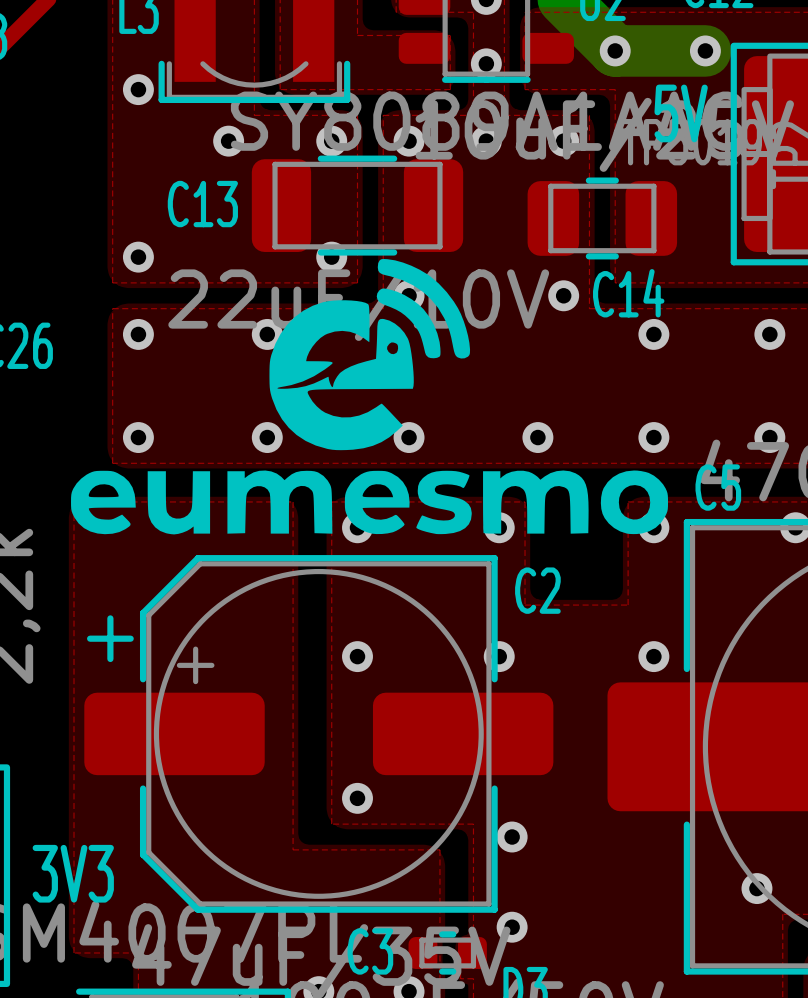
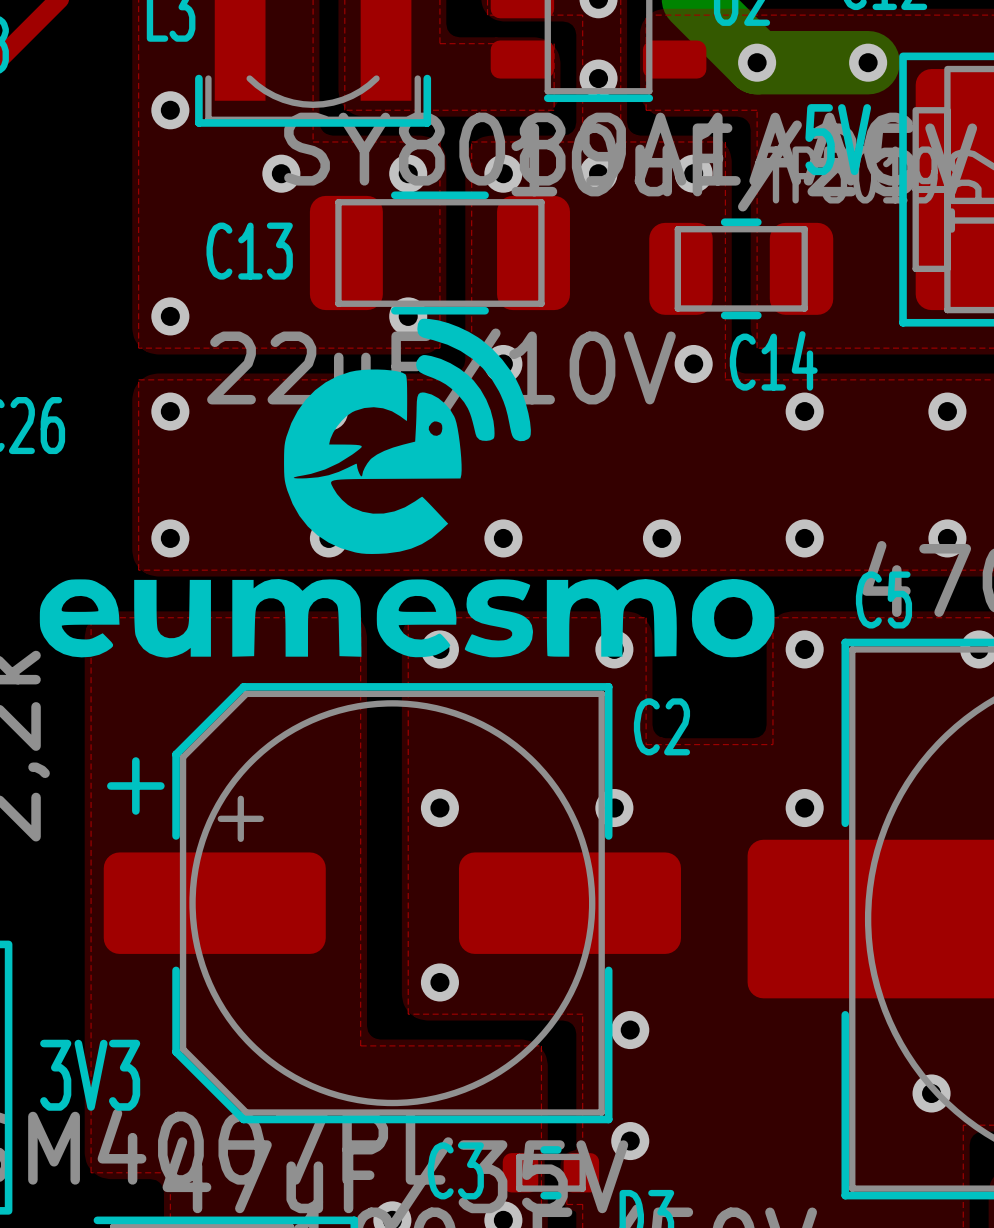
drawing position: (369, 396) -> (407, 488)

